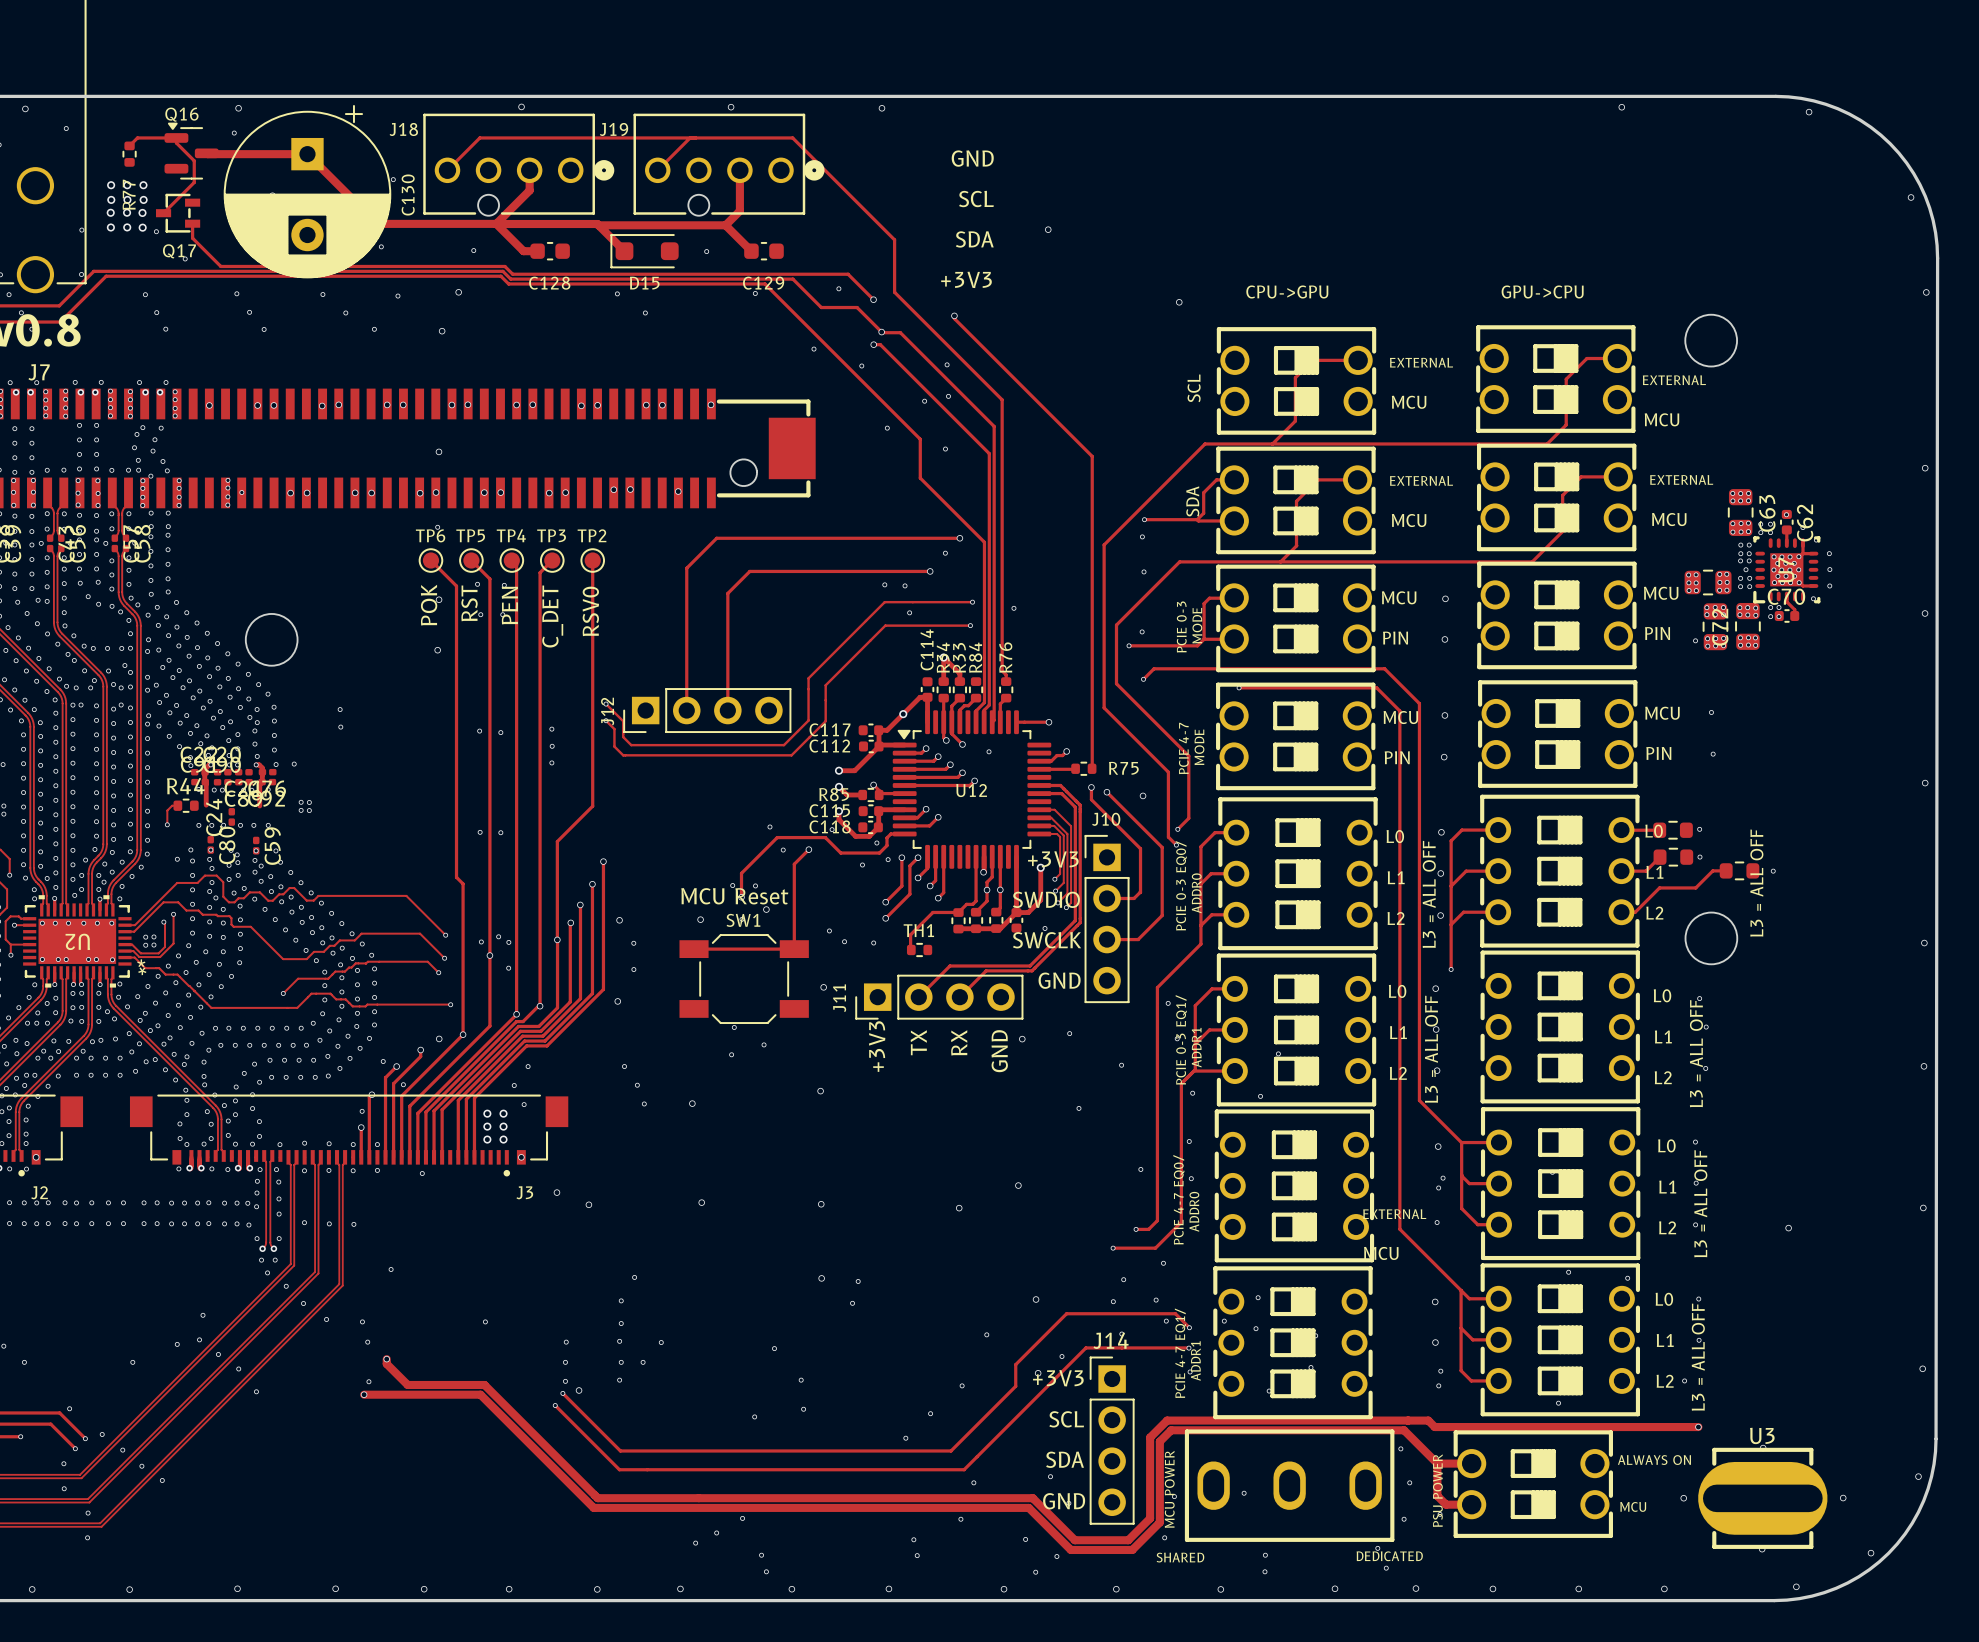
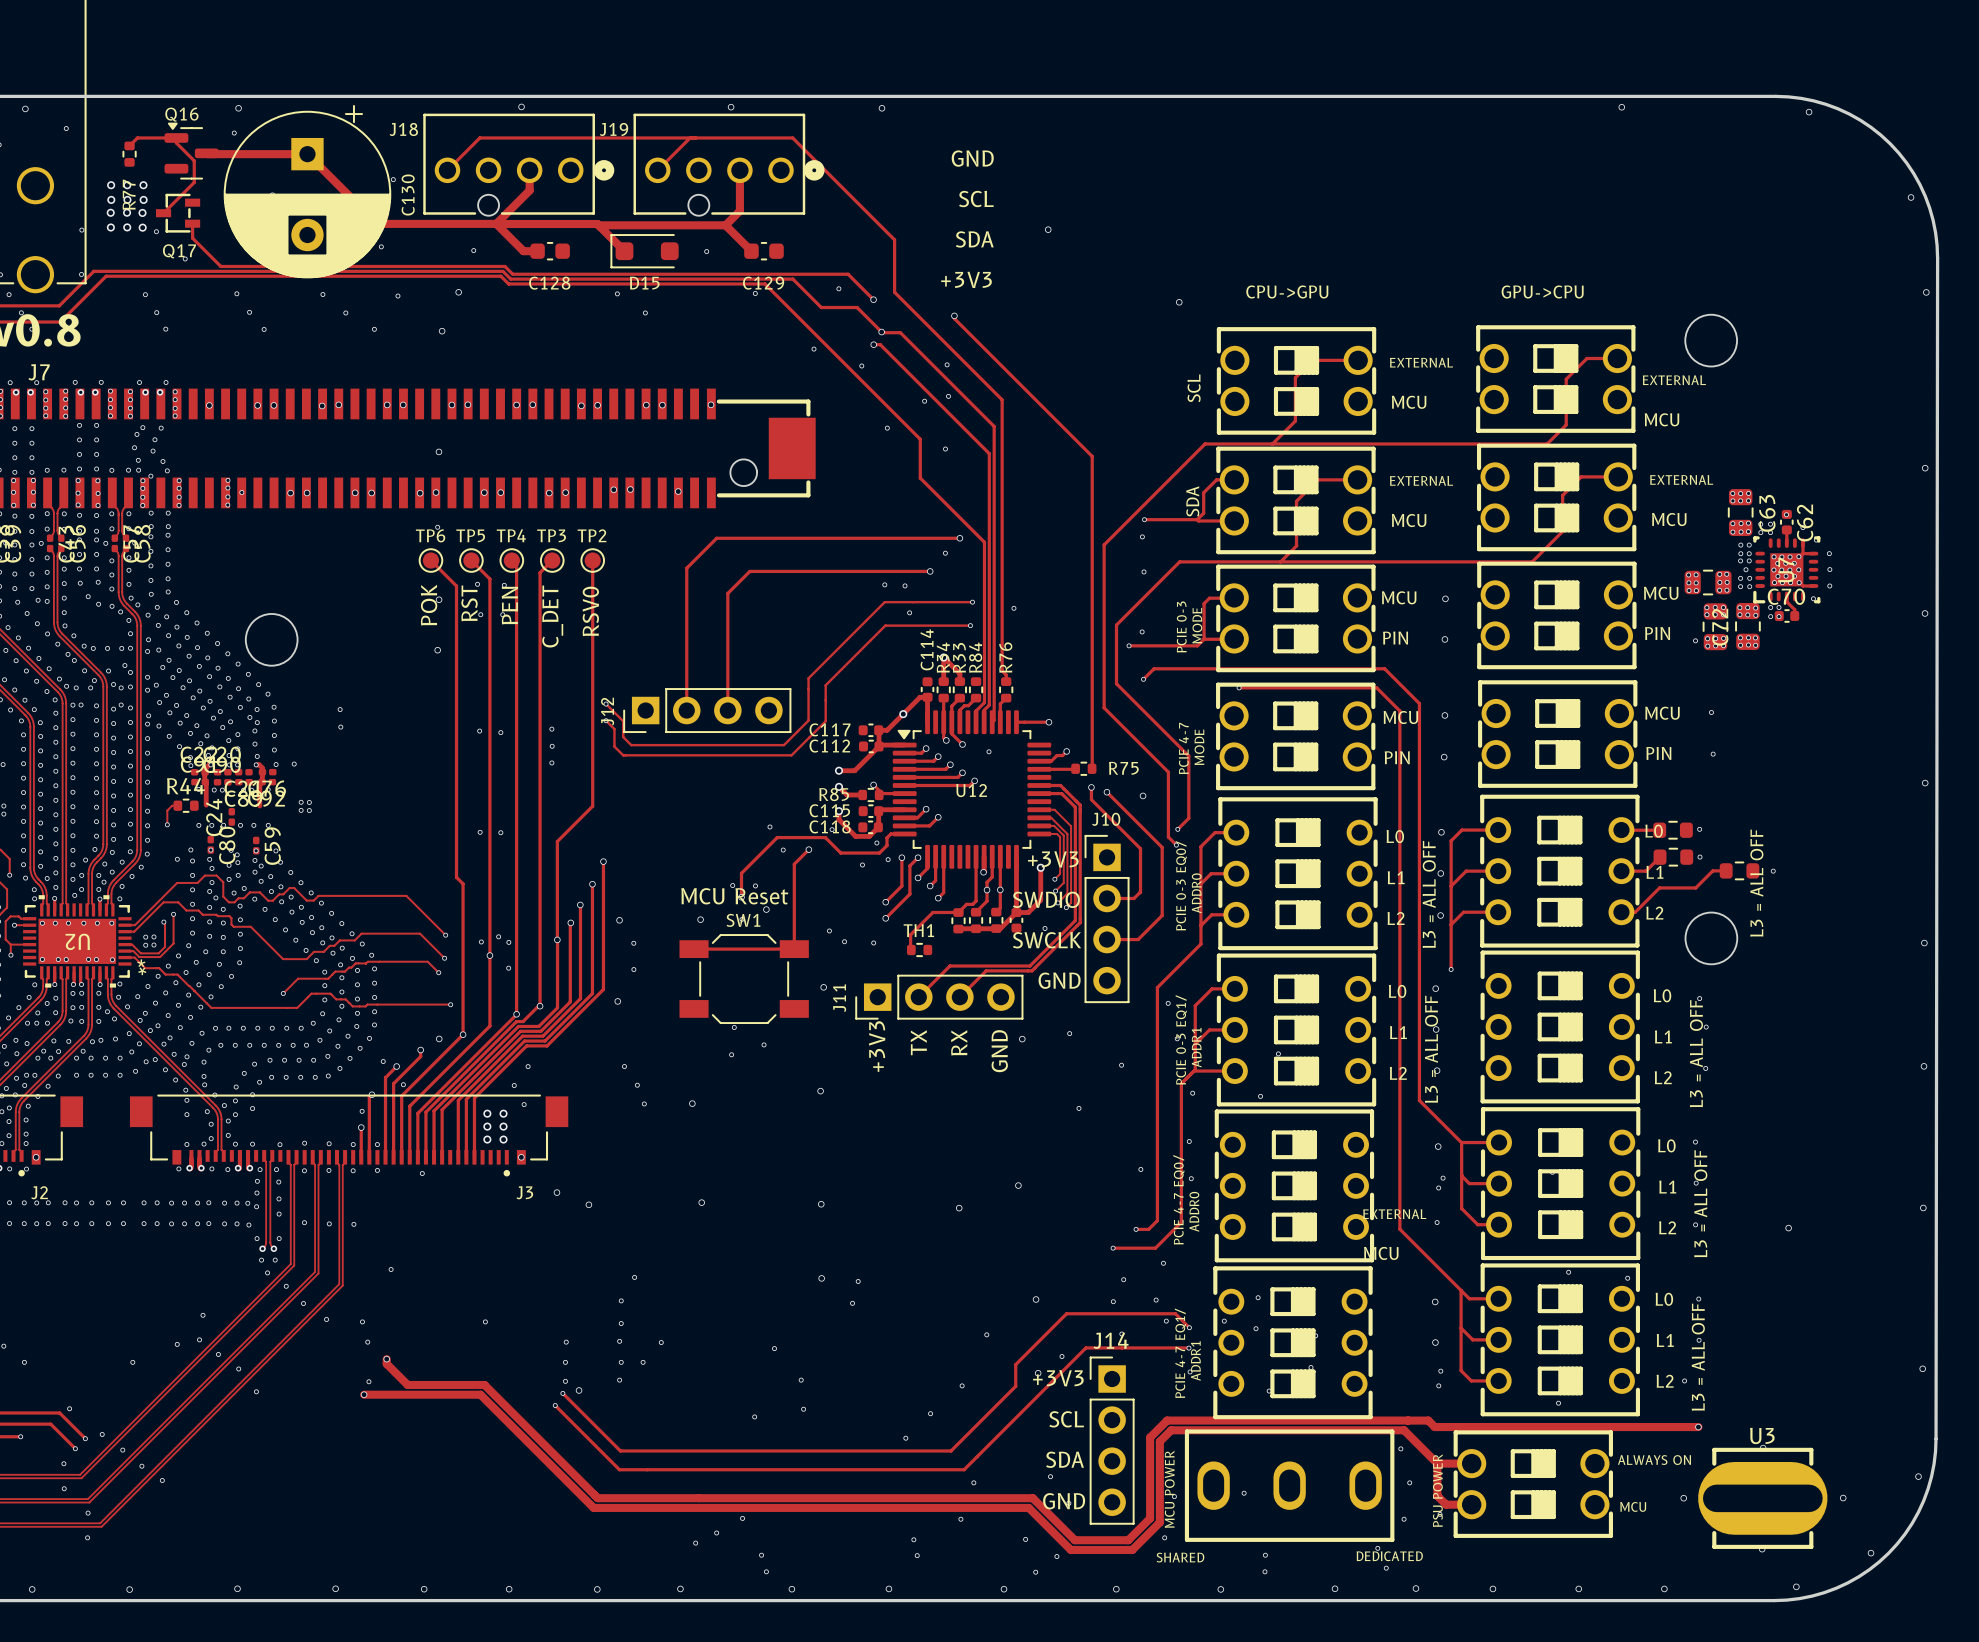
via: (259, 1121) -> none
via: (179, 1123) -> none
via: (259, 1136) -> none
via: (180, 1138) -> none

